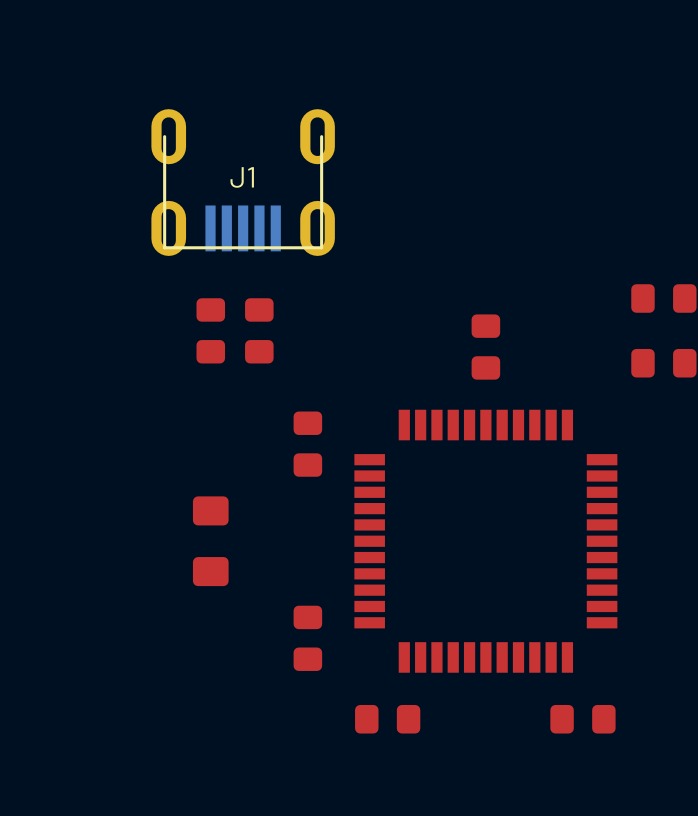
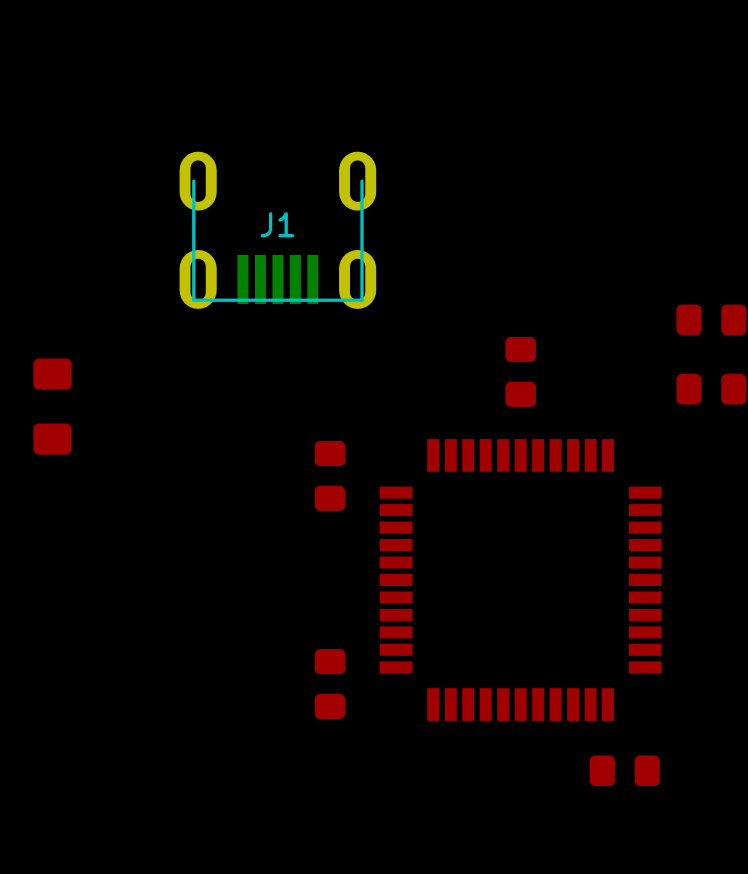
J1 position: (243, 182) -> (277, 230)
part: (210, 330) -> none
part: (259, 330) -> none
part position: (210, 541) -> (52, 406)
part: (387, 719) -> none

